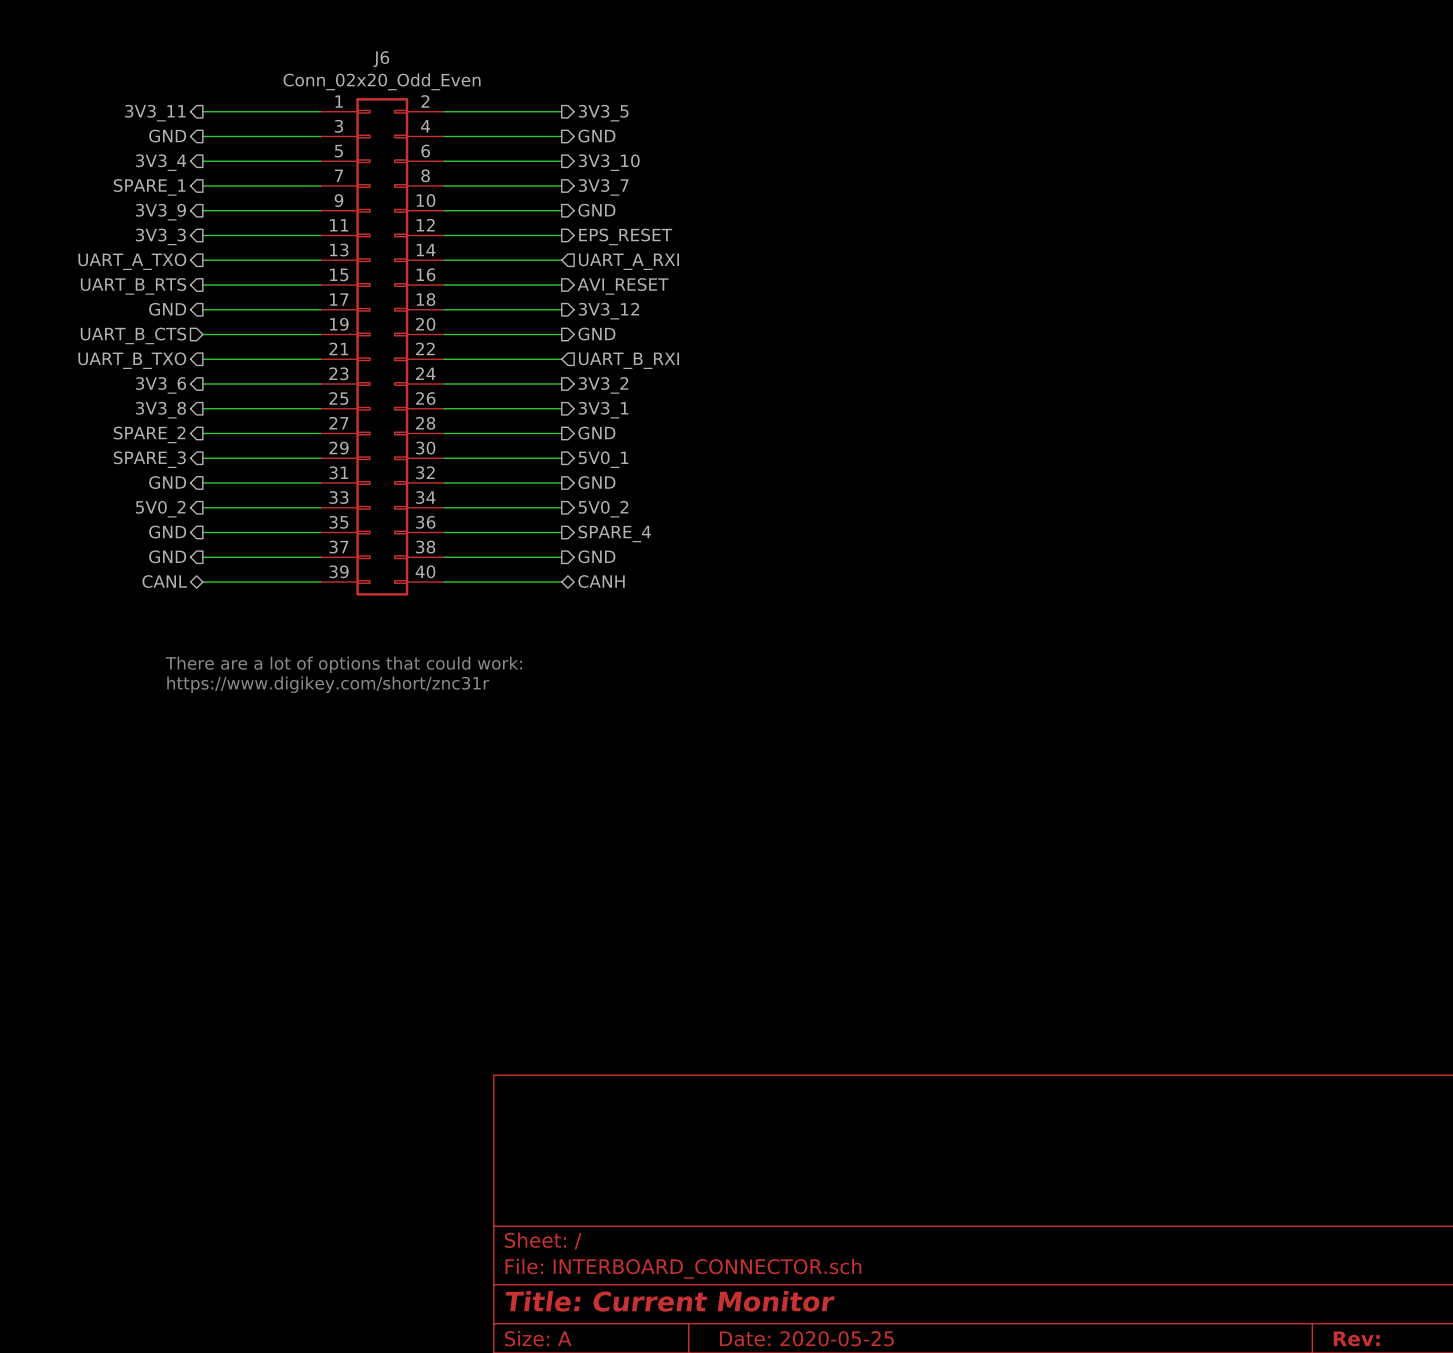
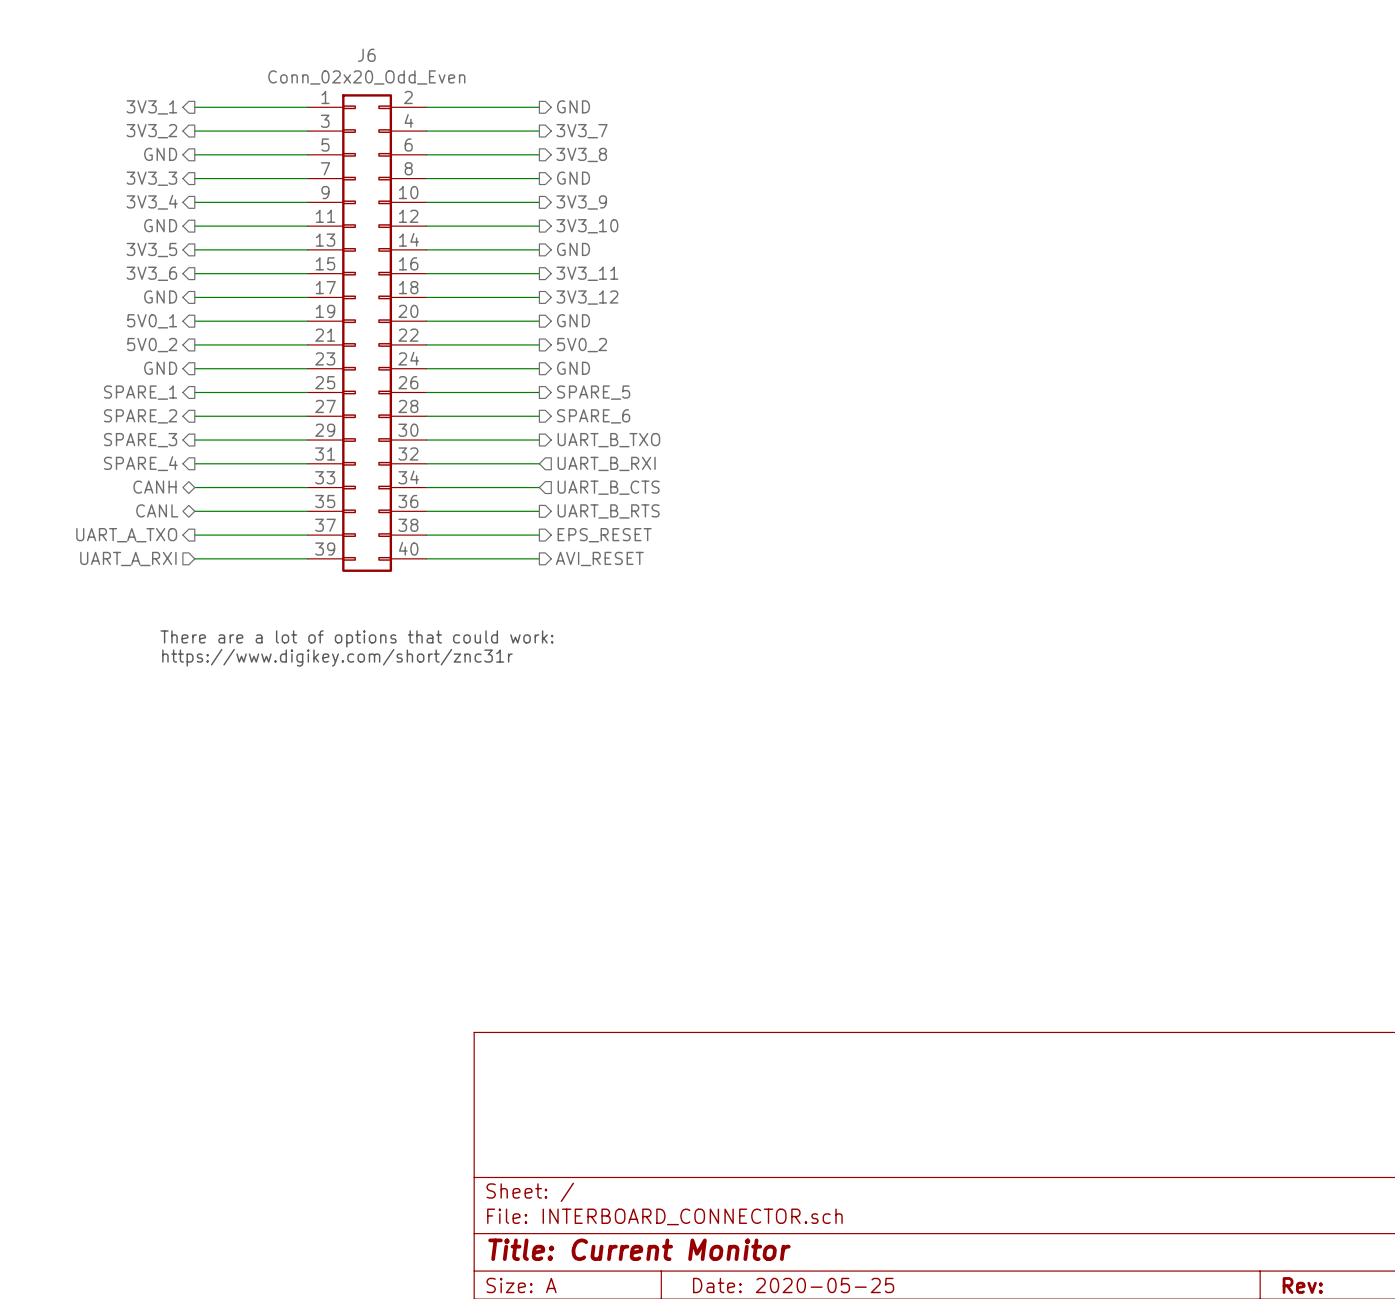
hierarchical label: 3V3_11 (155, 113) -> 3V3_1 (151, 107)
hierarchical label: 3V3_5 (603, 113) -> GND (573, 106)
hierarchical label: GND (167, 136) -> 3V3_2 (151, 131)
hierarchical label: GND (596, 136) -> 3V3_7 (582, 131)
hierarchical label: 3V3_4 (161, 162) -> GND (160, 154)
hierarchical label: 3V3_10 (609, 162) -> 3V3_8 (581, 154)
hierarchical label: SPARE_1 (149, 187) -> 3V3_3 (151, 178)
hierarchical label: 3V3_7 (603, 187) -> GND (573, 178)
hierarchical label: GND (596, 210) -> 3V3_9 (581, 202)
hierarchical label: 3V3_9 (160, 212) -> 3V3_4 (152, 202)
hierarchical label: 3V3_3 (160, 236) -> GND (160, 225)
hierarchical label: EPS_RESET (625, 236) -> 3V3_10 (587, 226)
hierarchical label: UART_A_TXO (132, 261) -> 3V3_5 (151, 250)
hierarchical label shape: input (628, 261) -> output (573, 249)
hierarchical label: UART_A_RXI (628, 261) -> GND (573, 249)
hierarchical label: UART_B_RTS (133, 286) -> 3V3_6 (151, 273)
hierarchical label: AVI_RESET (623, 286) -> 3V3_11 (587, 273)
hierarchical label shape: input (133, 335) -> output (152, 321)
hierarchical label: UART_B_CTS (133, 335) -> 5V0_1 (152, 321)
hierarchical label: UART_B_TXO (132, 360) -> 5V0_2 (152, 345)
hierarchical label shape: input (628, 360) -> output (582, 345)
hierarchical label: UART_B_RXI (628, 360) -> 5V0_2 (582, 345)
hierarchical label: 3V3_6 (161, 385) -> GND (160, 368)
hierarchical label: 3V3_2 (603, 385) -> GND (573, 368)
hierarchical label: 3V3_8 (160, 410) -> SPARE_1 (140, 392)
hierarchical label: 3V3_1 (603, 410) -> SPARE_5 (593, 392)
hierarchical label: GND (596, 433) -> SPARE_6 (593, 416)
hierarchical label: 5V0_1 (603, 459) -> UART_B_TXO (608, 440)
hierarchical label: GND (167, 482) -> SPARE_4 (140, 463)
hierarchical label shape: output (596, 482) -> input (606, 463)
hierarchical label: GND (596, 482) -> UART_B_RXI (606, 463)
hierarchical label shape: output (160, 509) -> bidirectional (154, 487)
hierarchical label: 5V0_2 (160, 509) -> CANH (154, 487)
hierarchical label shape: output (603, 509) -> input (608, 487)
hierarchical label: 5V0_2 (603, 509) -> UART_B_CTS (608, 487)
hierarchical label shape: output (167, 532) -> bidirectional (157, 510)
hierarchical label: GND (167, 532) -> CANL (157, 510)
hierarchical label: SPARE_4 (614, 533) -> UART_B_RTS (608, 511)
hierarchical label: GND (167, 556) -> UART_A_TXO (126, 535)
hierarchical label: GND (596, 556) -> EPS_RESET (604, 535)
hierarchical label shape: bidirectional (164, 581) -> input (128, 558)
hierarchical label: CANL (164, 581) -> UART_A_RXI (128, 558)
hierarchical label shape: bidirectional (601, 581) -> output (599, 558)
hierarchical label: CANH (601, 581) -> AVI_RESET (599, 558)

